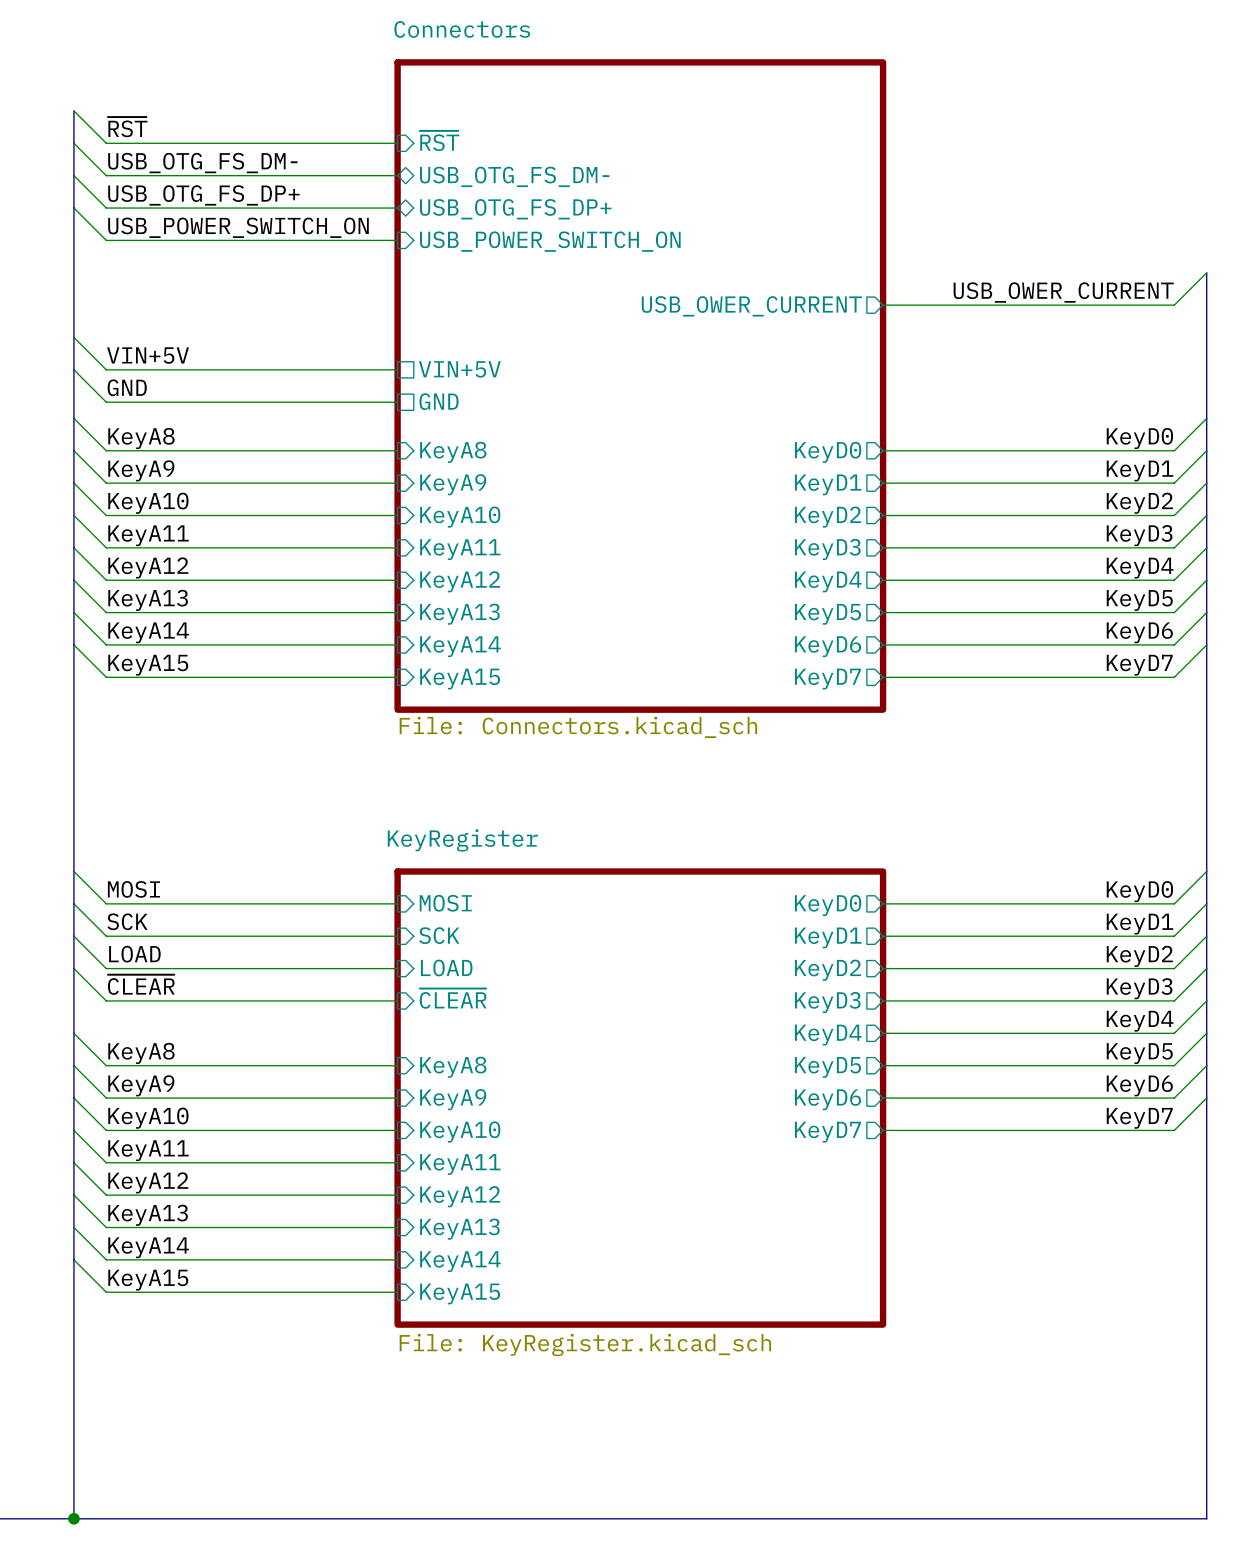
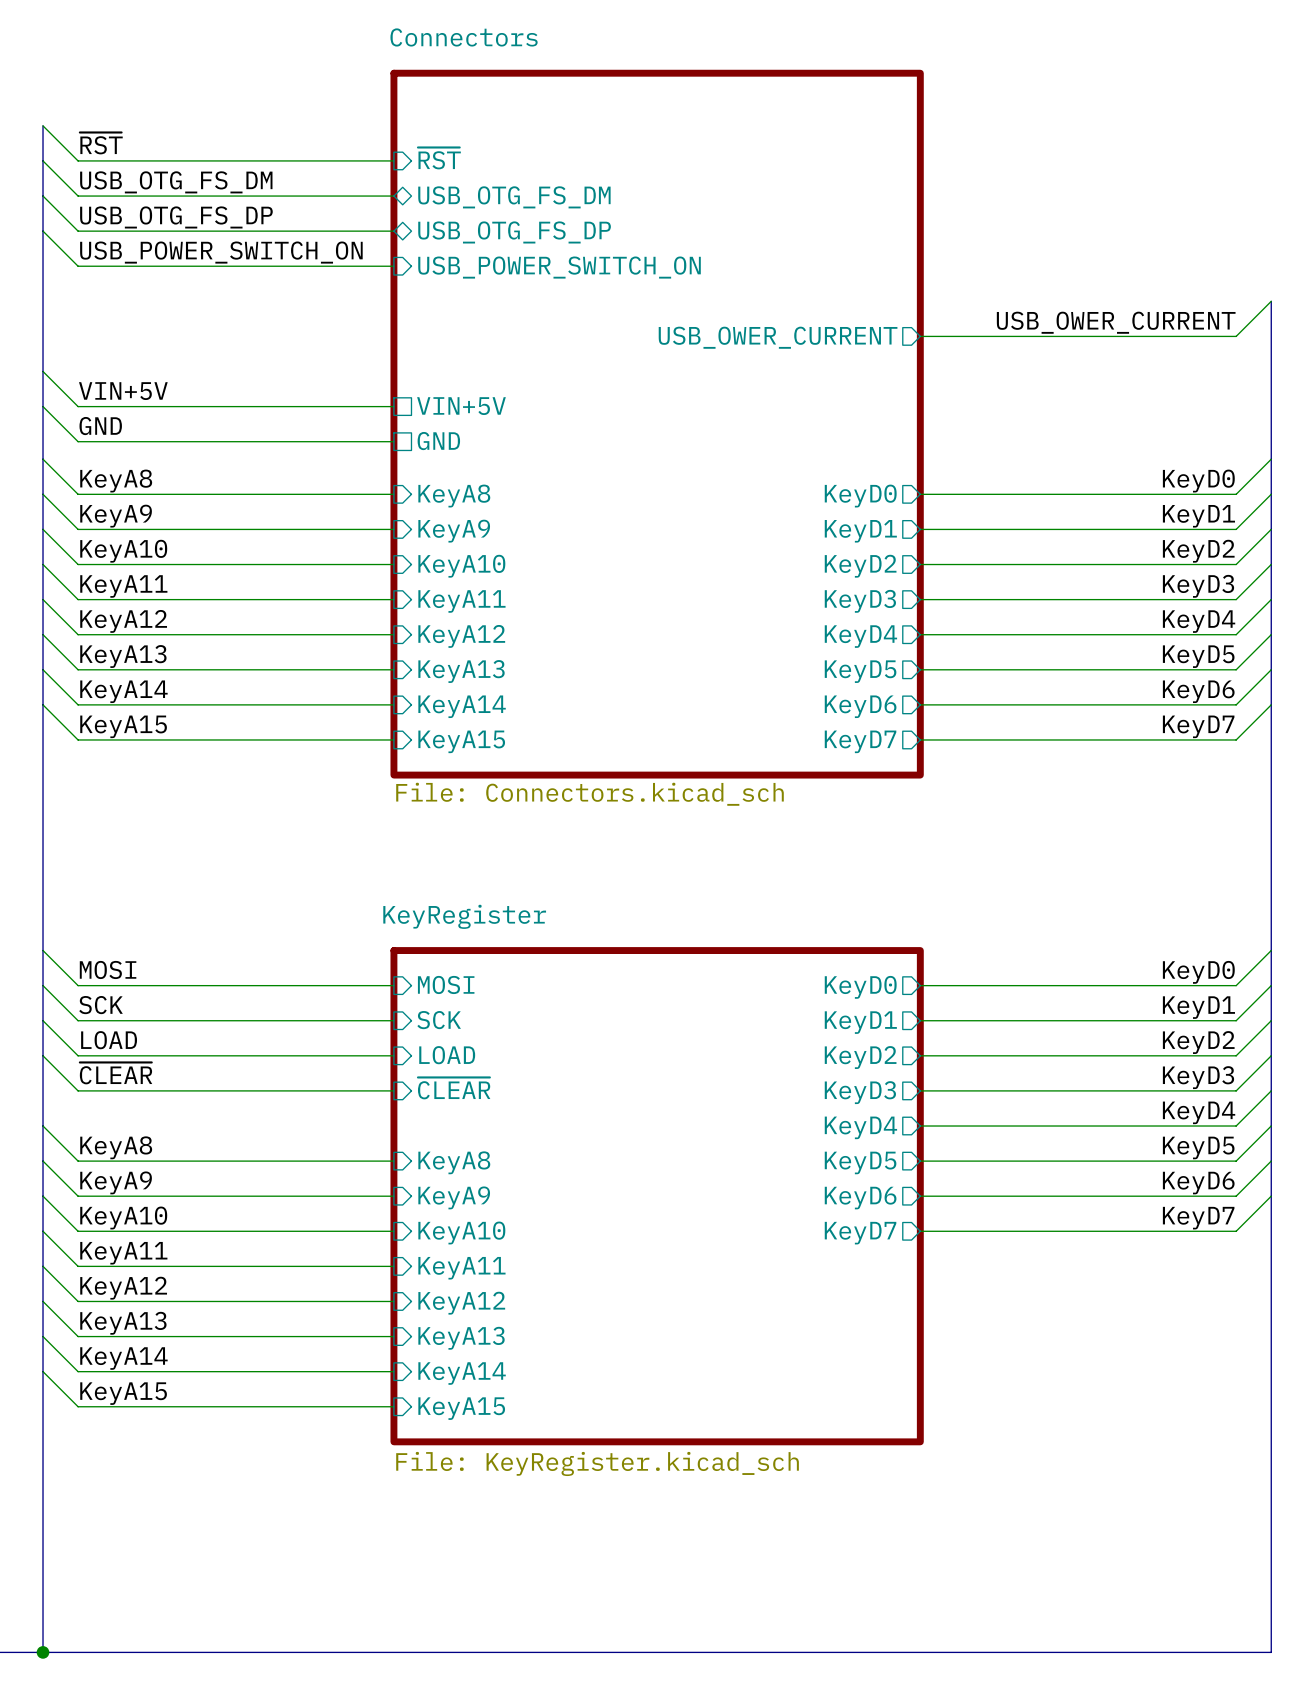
label: USB_OTG_FS_DM- (202, 163) -> USB_OTG_FS_DM (176, 182)
sheet pin: USB_OTG_FS_DM- (514, 176) -> USB_OTG_FS_DM (514, 197)
label: USB_OTG_FS_DP+ (203, 195) -> USB_OTG_FS_DP (176, 217)
sheet pin: USB_OTG_FS_DP+ (515, 209) -> USB_OTG_FS_DP (514, 232)

